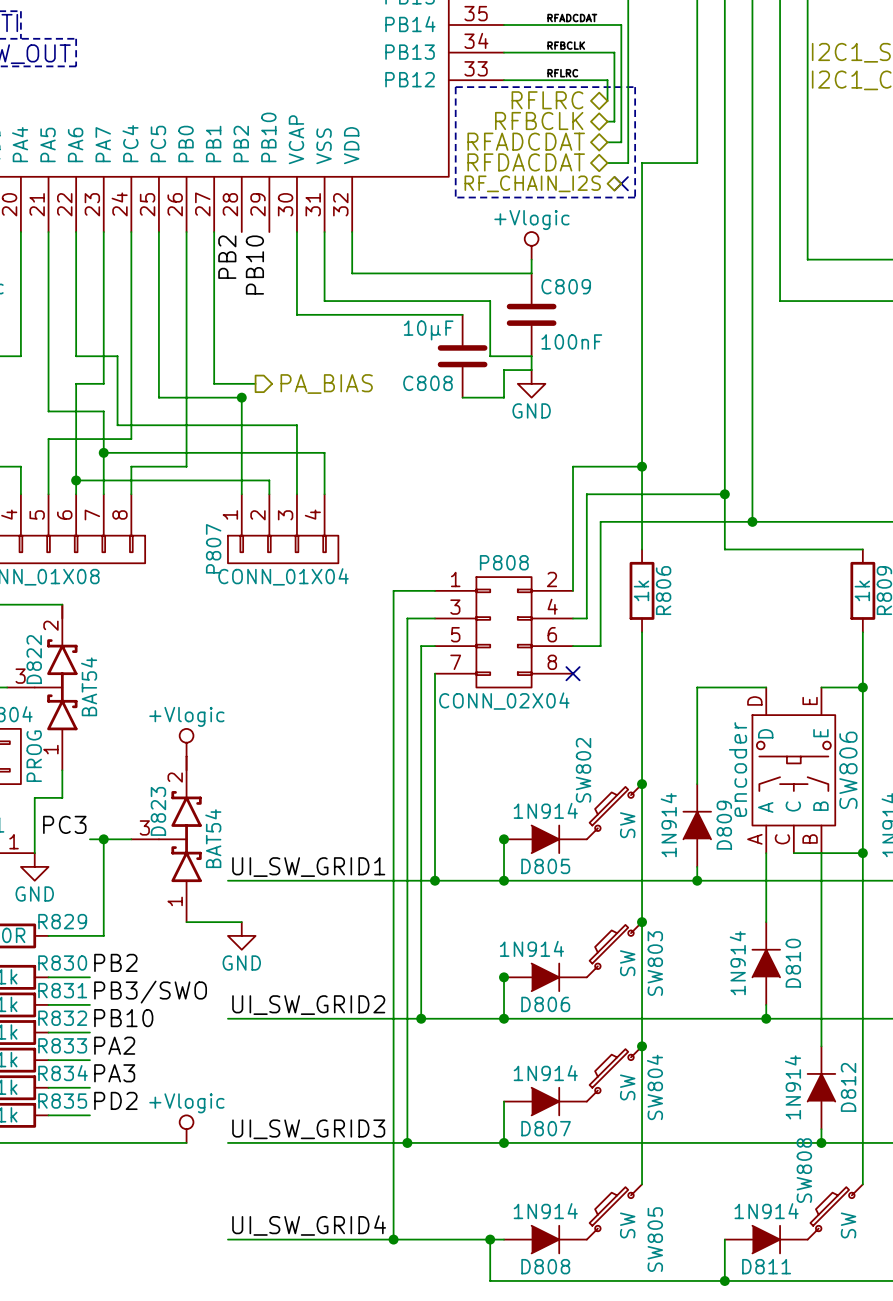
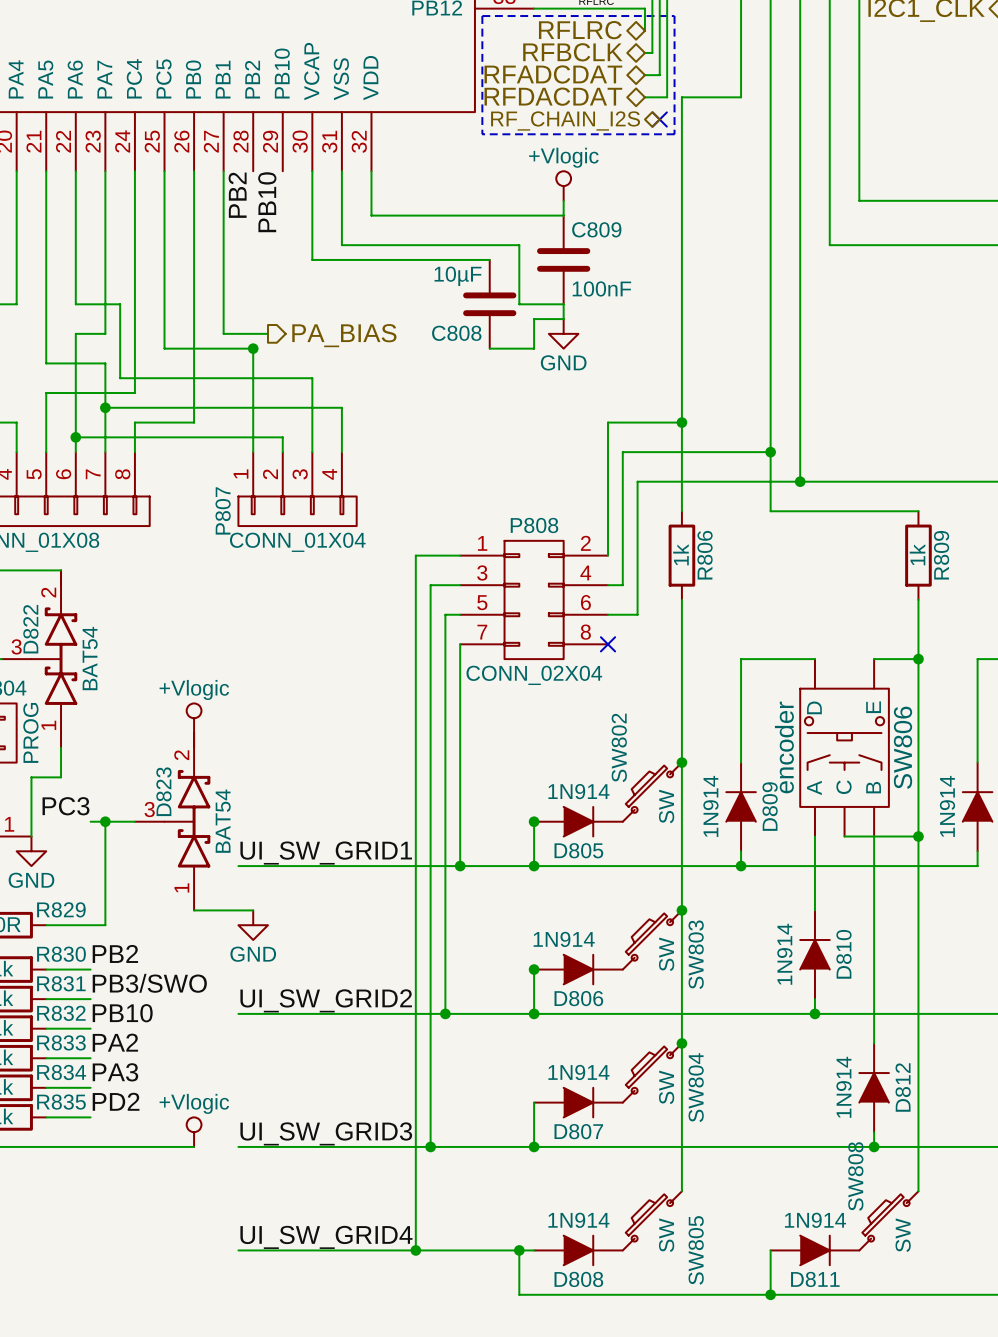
SW806 pin number: D (754, 700) -> none
SW806 pin number: E (810, 700) -> none
SW806 pin number: B (810, 838) -> none
SW806 pin number: A (754, 839) -> none
SW806 pin number: C (782, 839) -> none

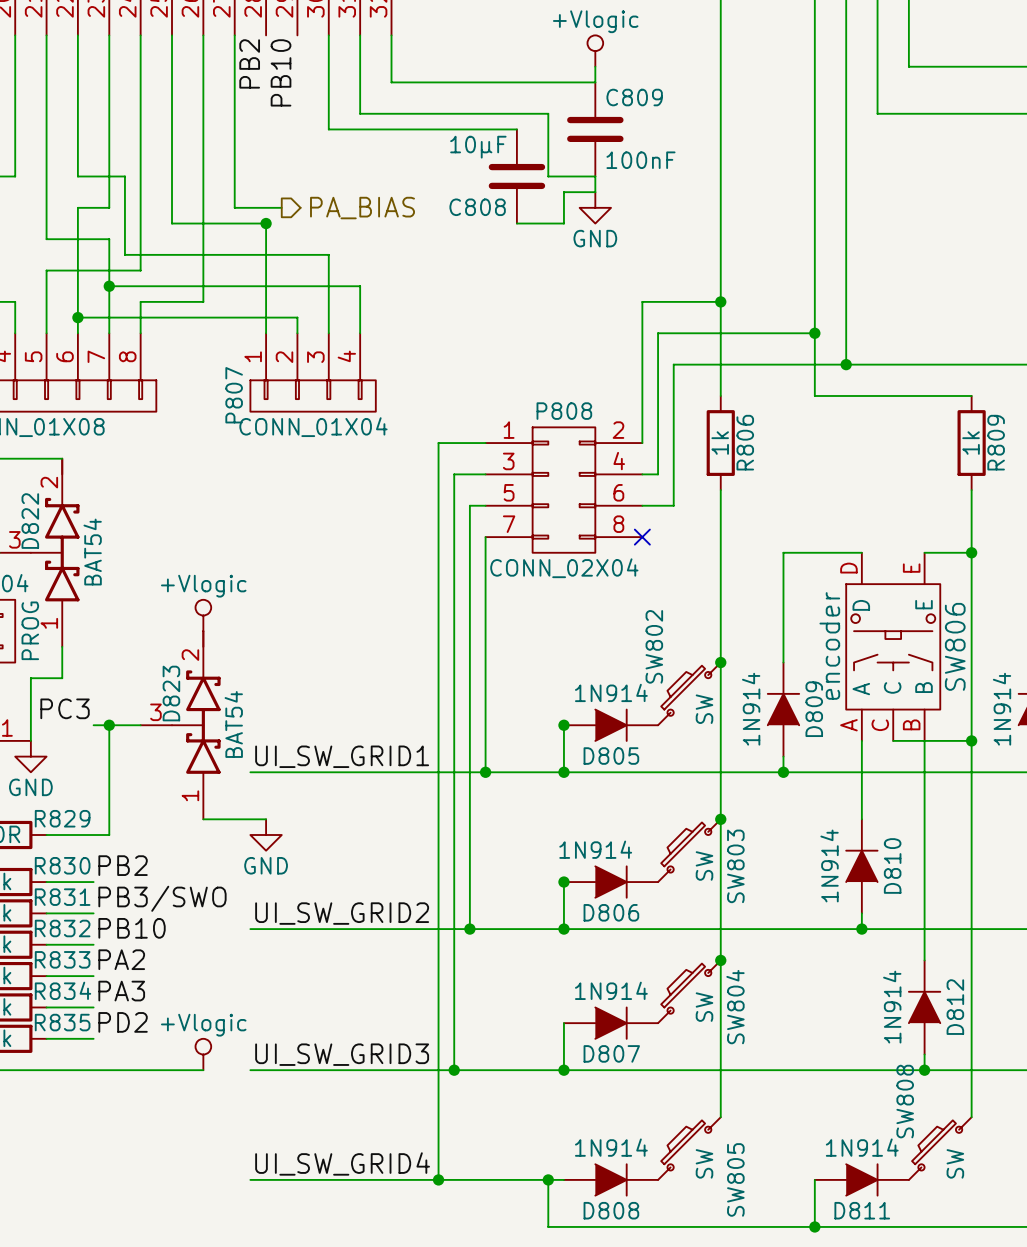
SW806 pin number: none -> D (848, 568)
SW806 pin number: none -> E (911, 568)
SW806 pin number: none -> A (848, 725)
SW806 pin number: none -> C (880, 725)
SW806 pin number: none -> B (911, 724)

